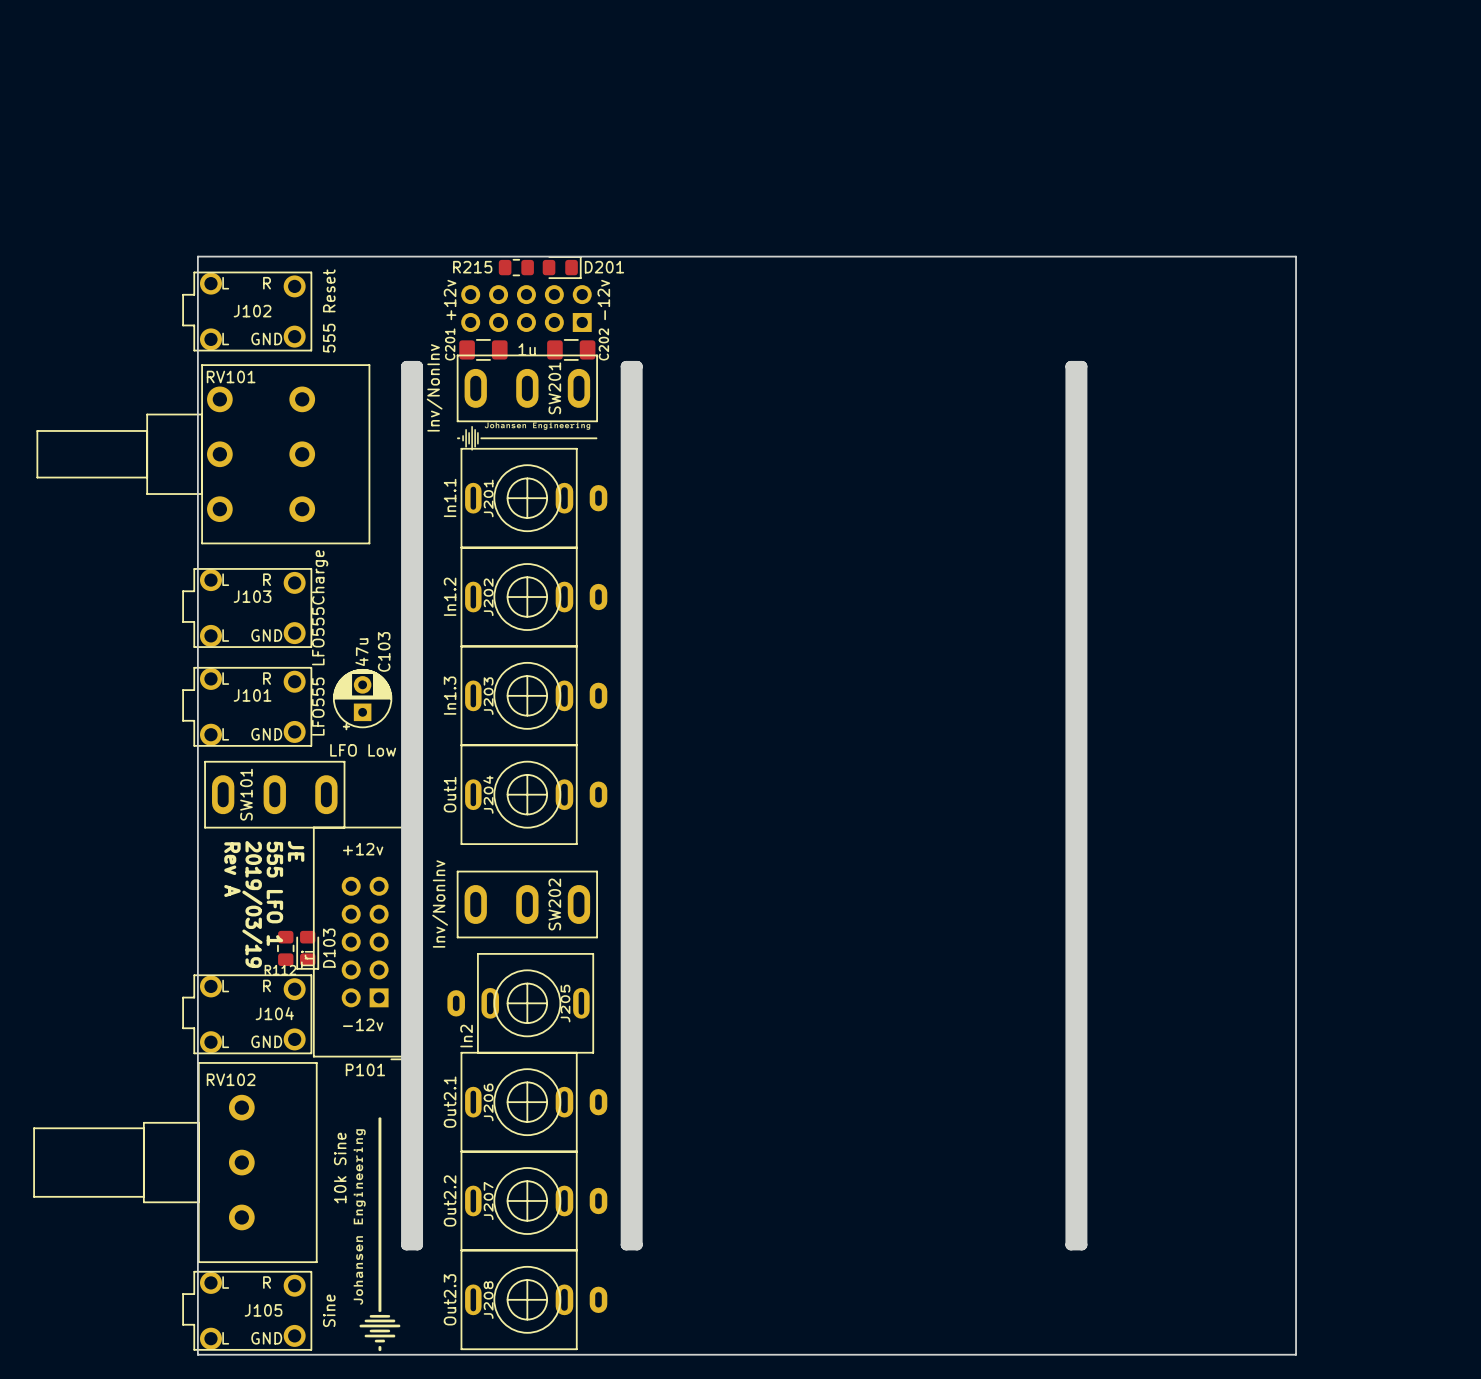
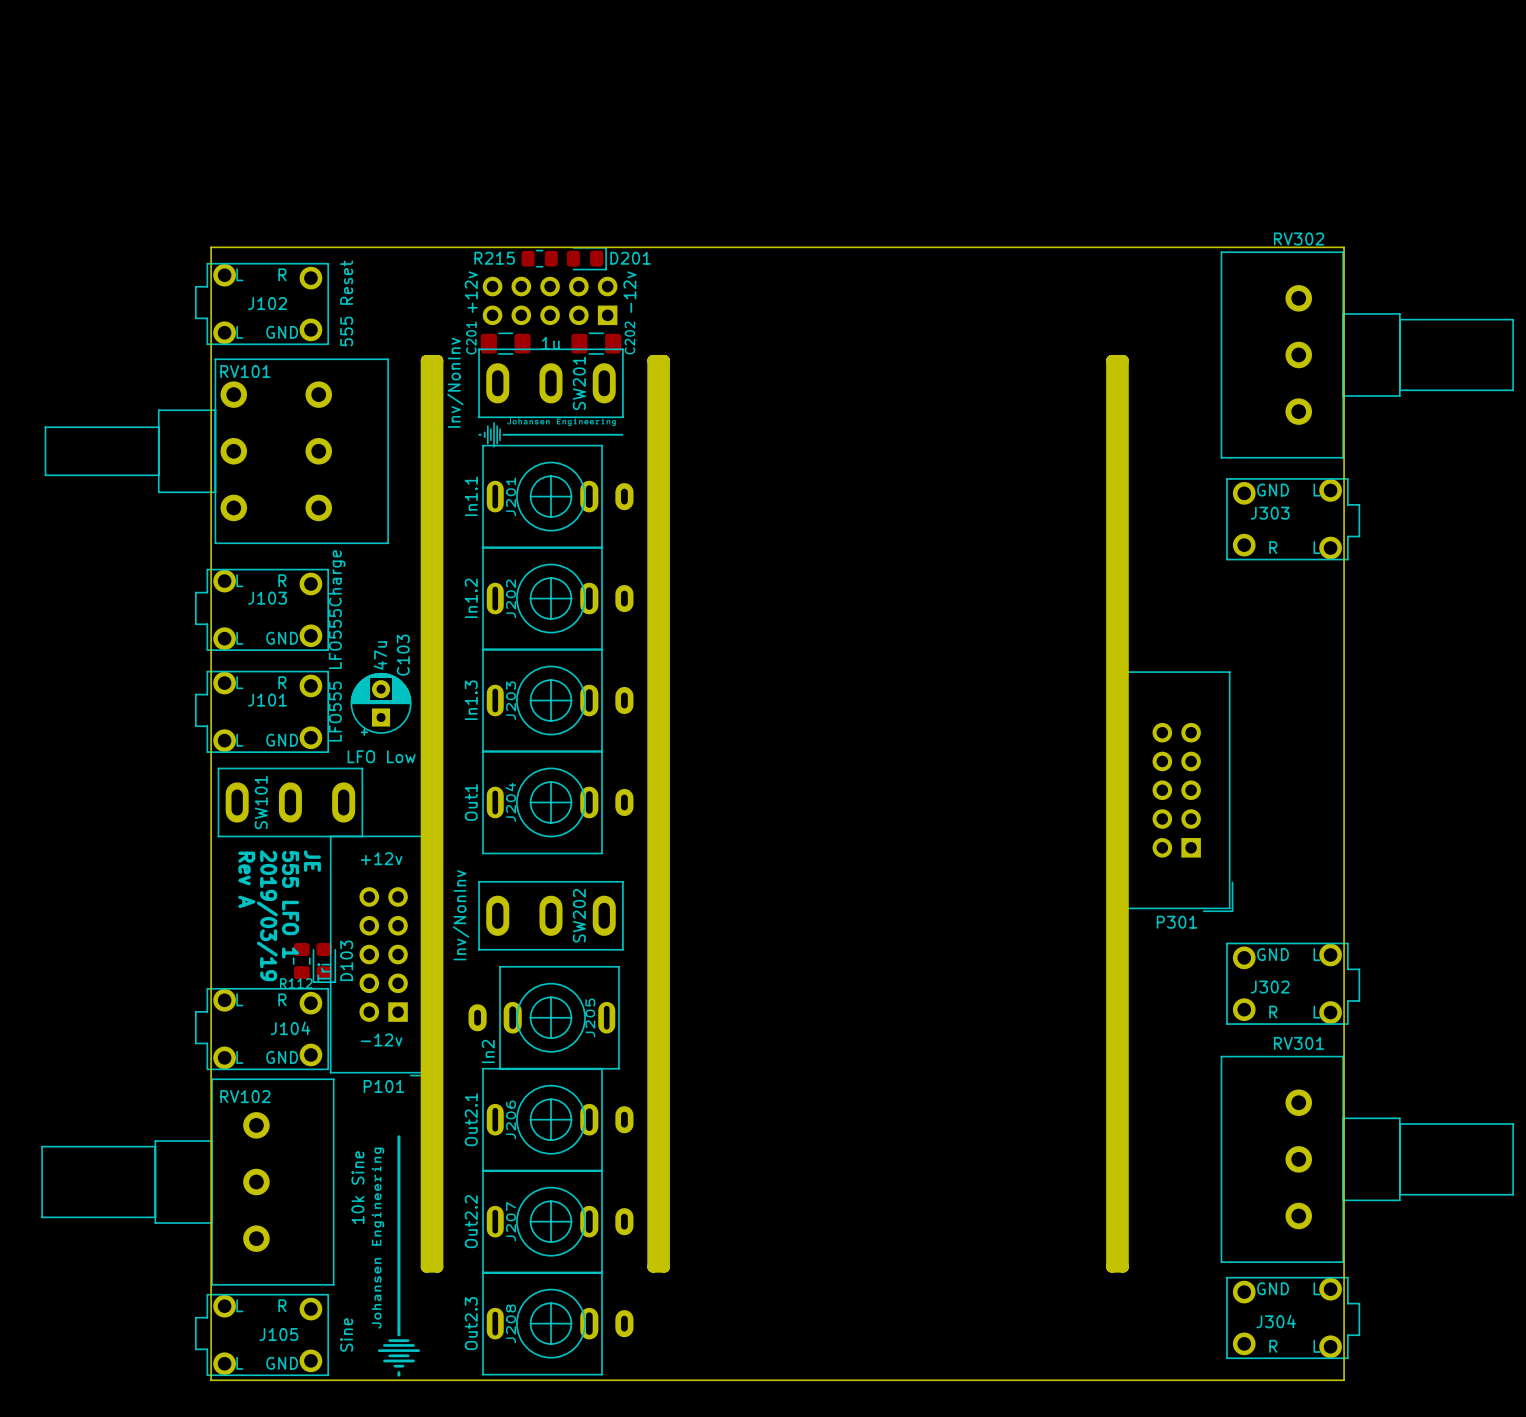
RV302: none -> (1367, 354)
J303: none -> (1293, 519)
P301: none -> (1178, 791)
J302: none -> (1293, 983)
RV301: none -> (1367, 1159)
J304: none -> (1293, 1317)

